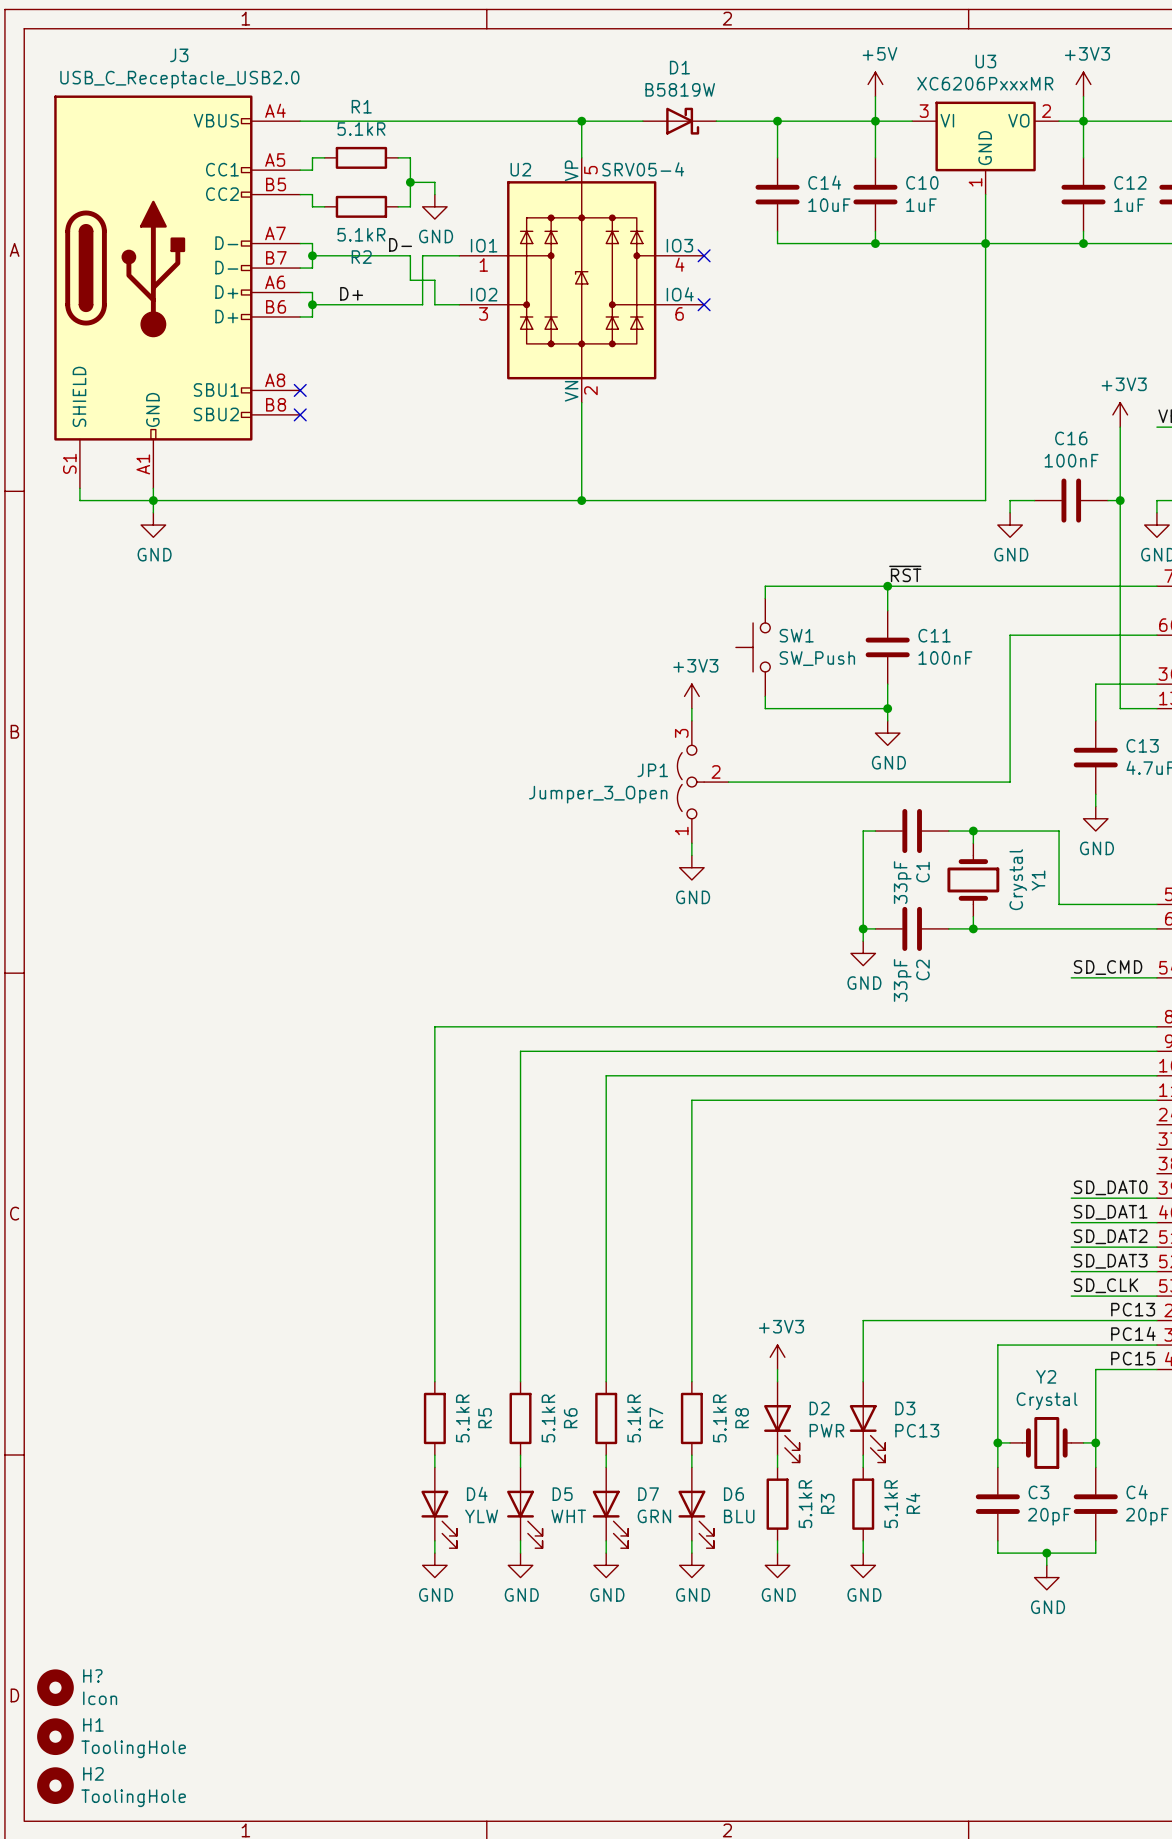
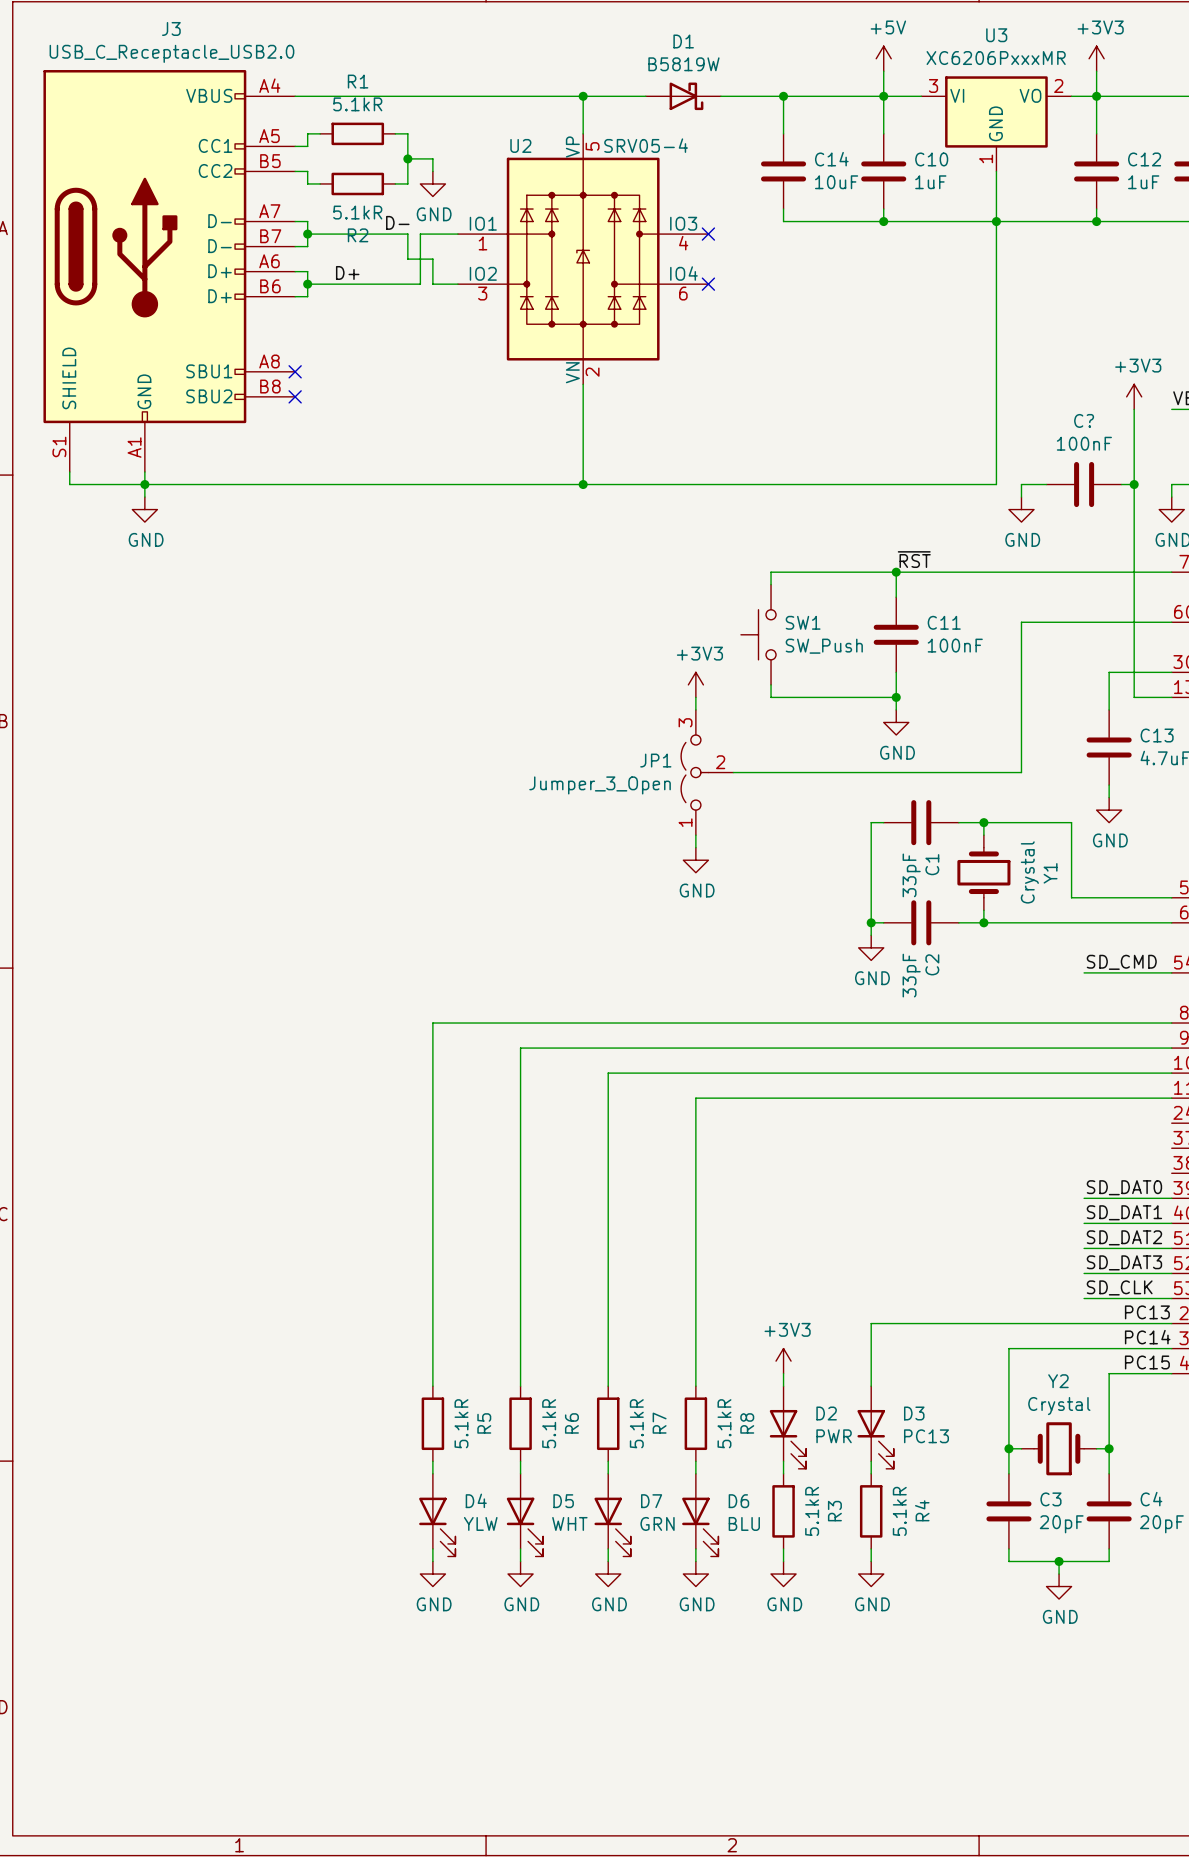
C16 name: C16 (1071, 438) -> C? (1084, 420)
H?: Icon (55, 1687) -> none
H1: ToolingHole (55, 1736) -> none
H2: ToolingHole (55, 1785) -> none

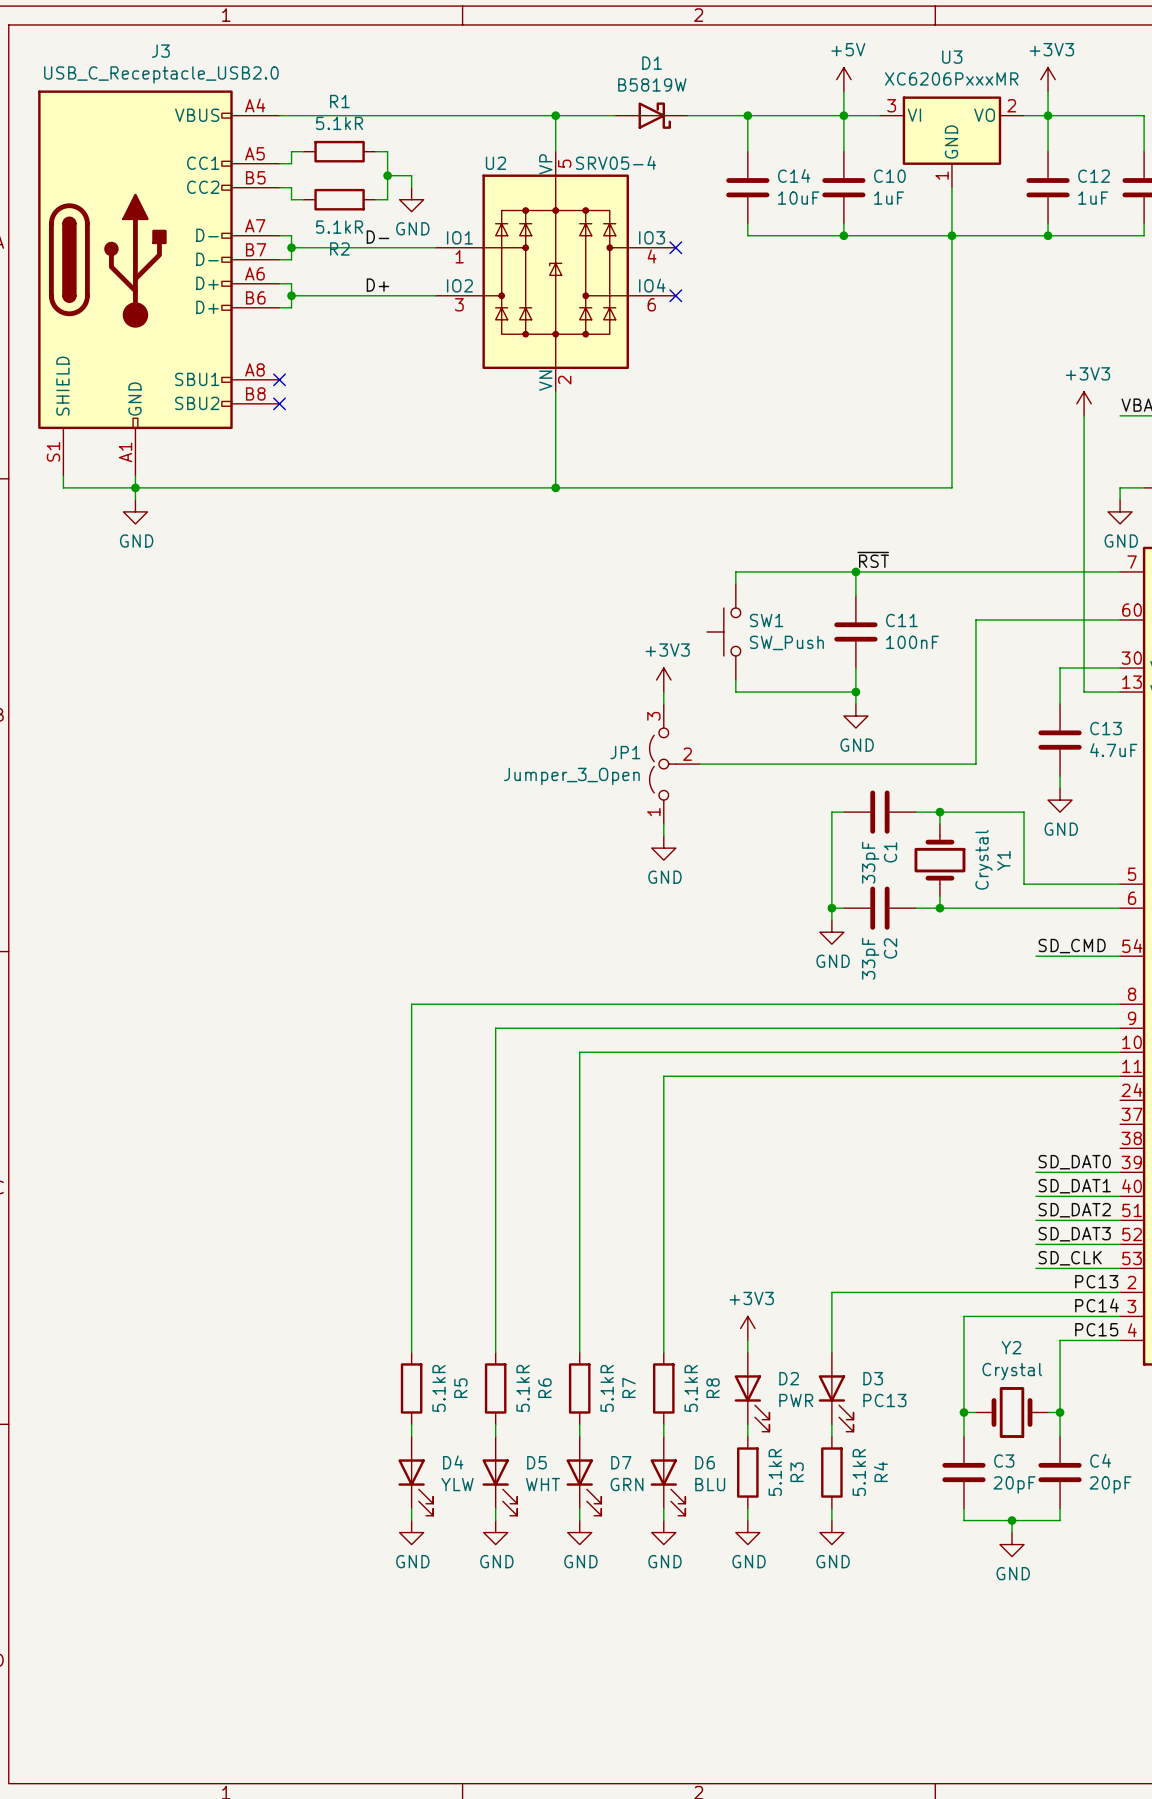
wire: (407, 234) (407, 259) (432, 259) (432, 284) -> (387, 247) (399, 247)
wire: (420, 234) (420, 284) -> (411, 295) (399, 295)
label position: D+ (347, 272) -> D+ (377, 285)
wire: (1046, 484) (1021, 484) (1021, 497) -> none
C?: 100nF (1084, 484) -> none
wire: (1121, 484) (1134, 484) -> none
junction: (1134, 484) -> none
power symbol: GND (1021, 509) -> none

